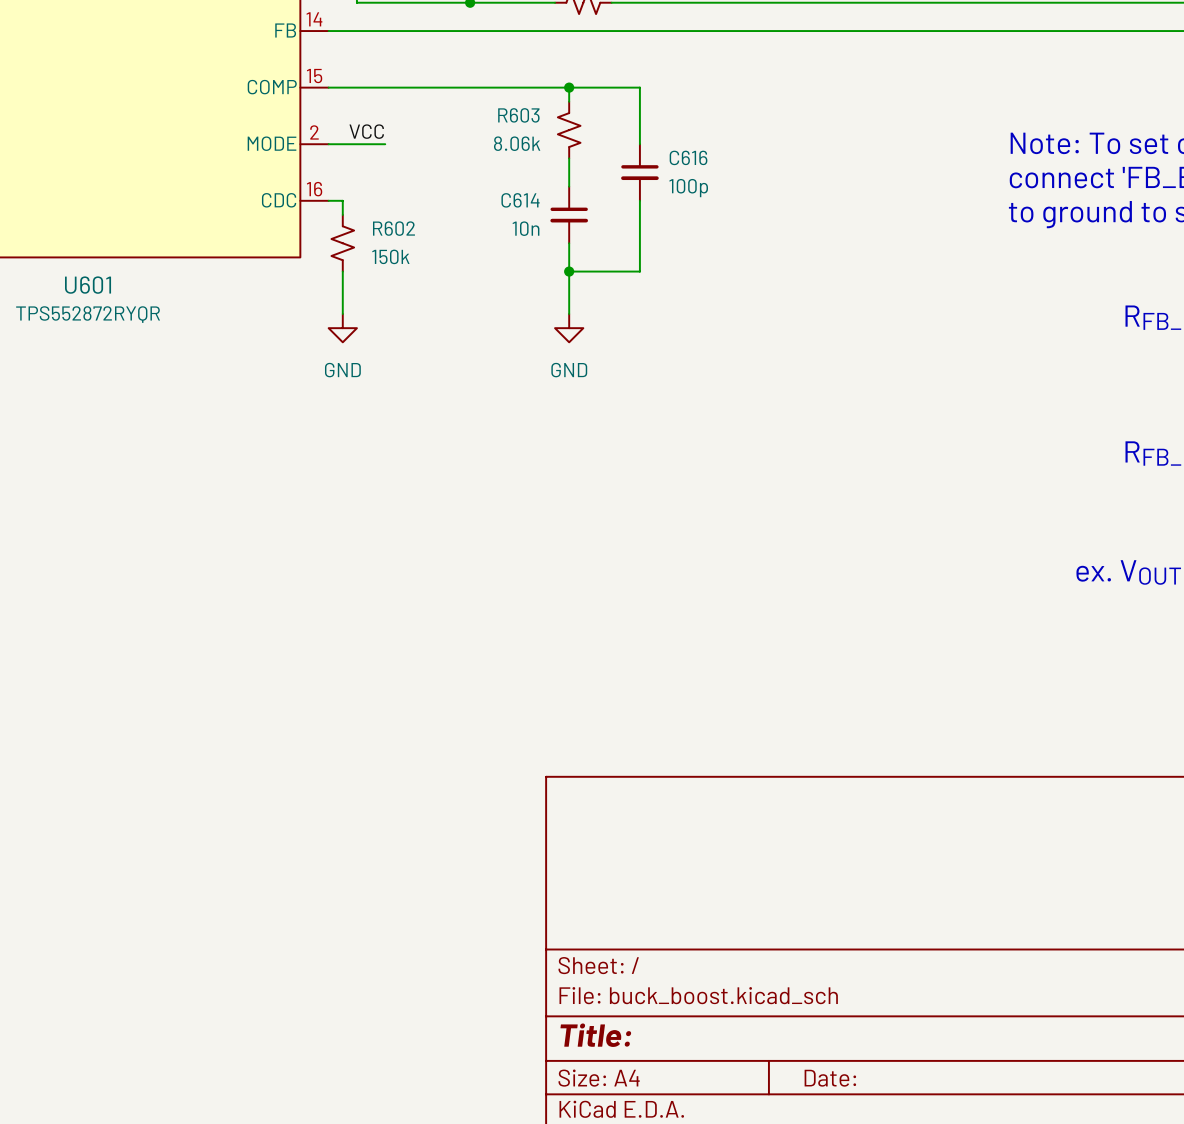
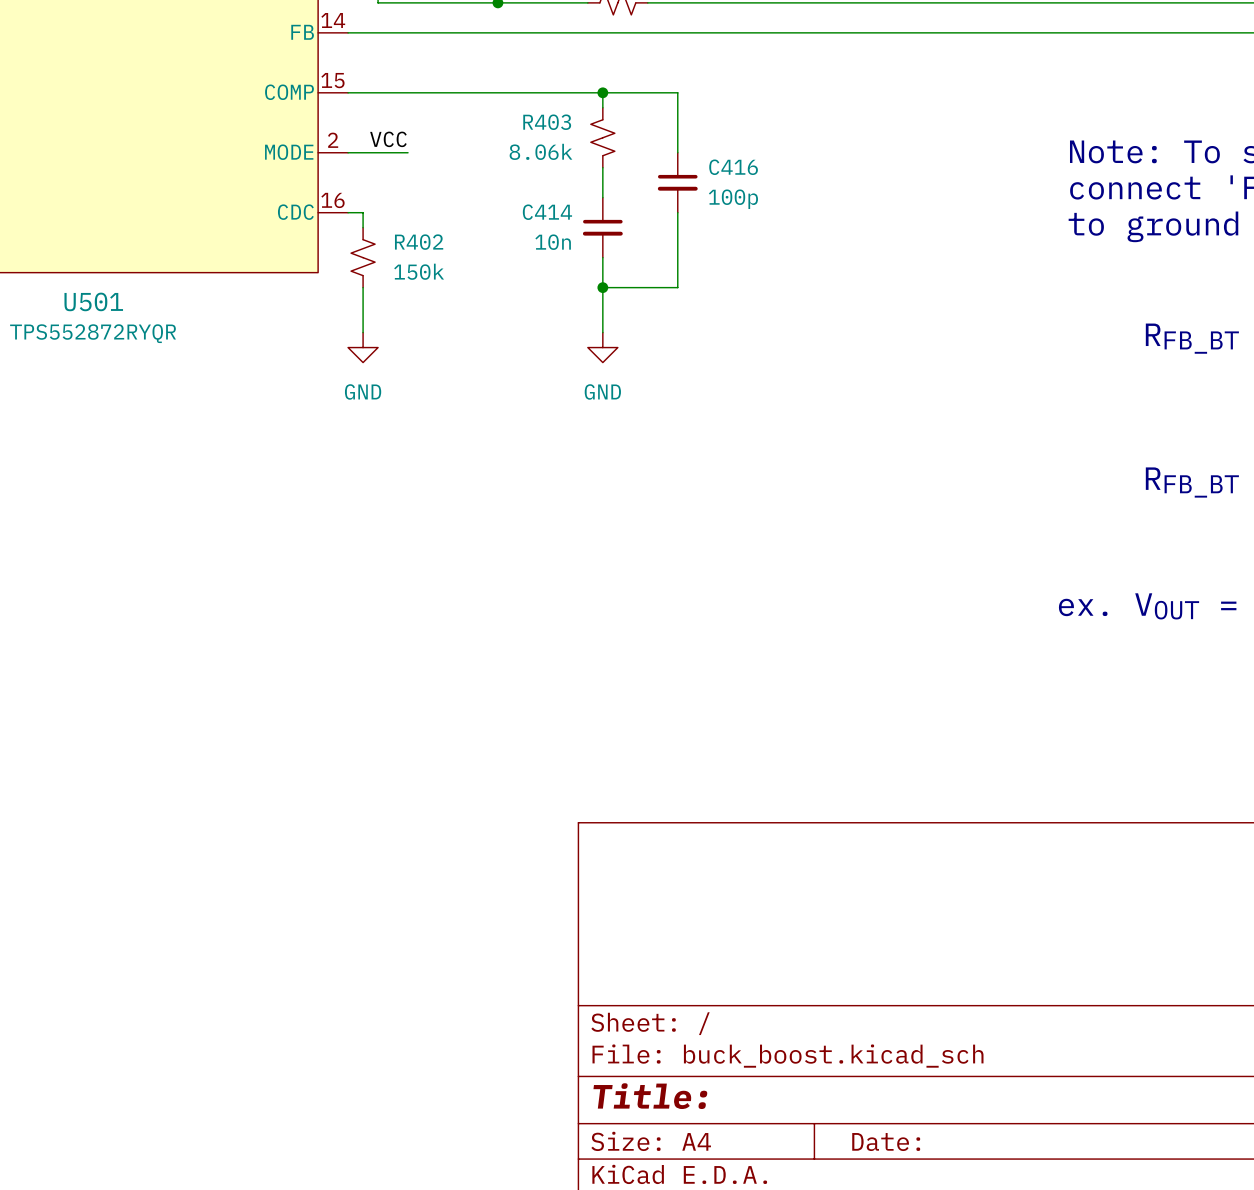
R603 name: R603 (518, 115) -> R403 (547, 122)
C616 name: C616 (688, 157) -> C416 (733, 167)
C614 name: C614 (520, 200) -> C414 (547, 212)
R602 name: R602 (393, 228) -> R402 (419, 242)
U601 name: U601 (88, 285) -> U501 (93, 301)

